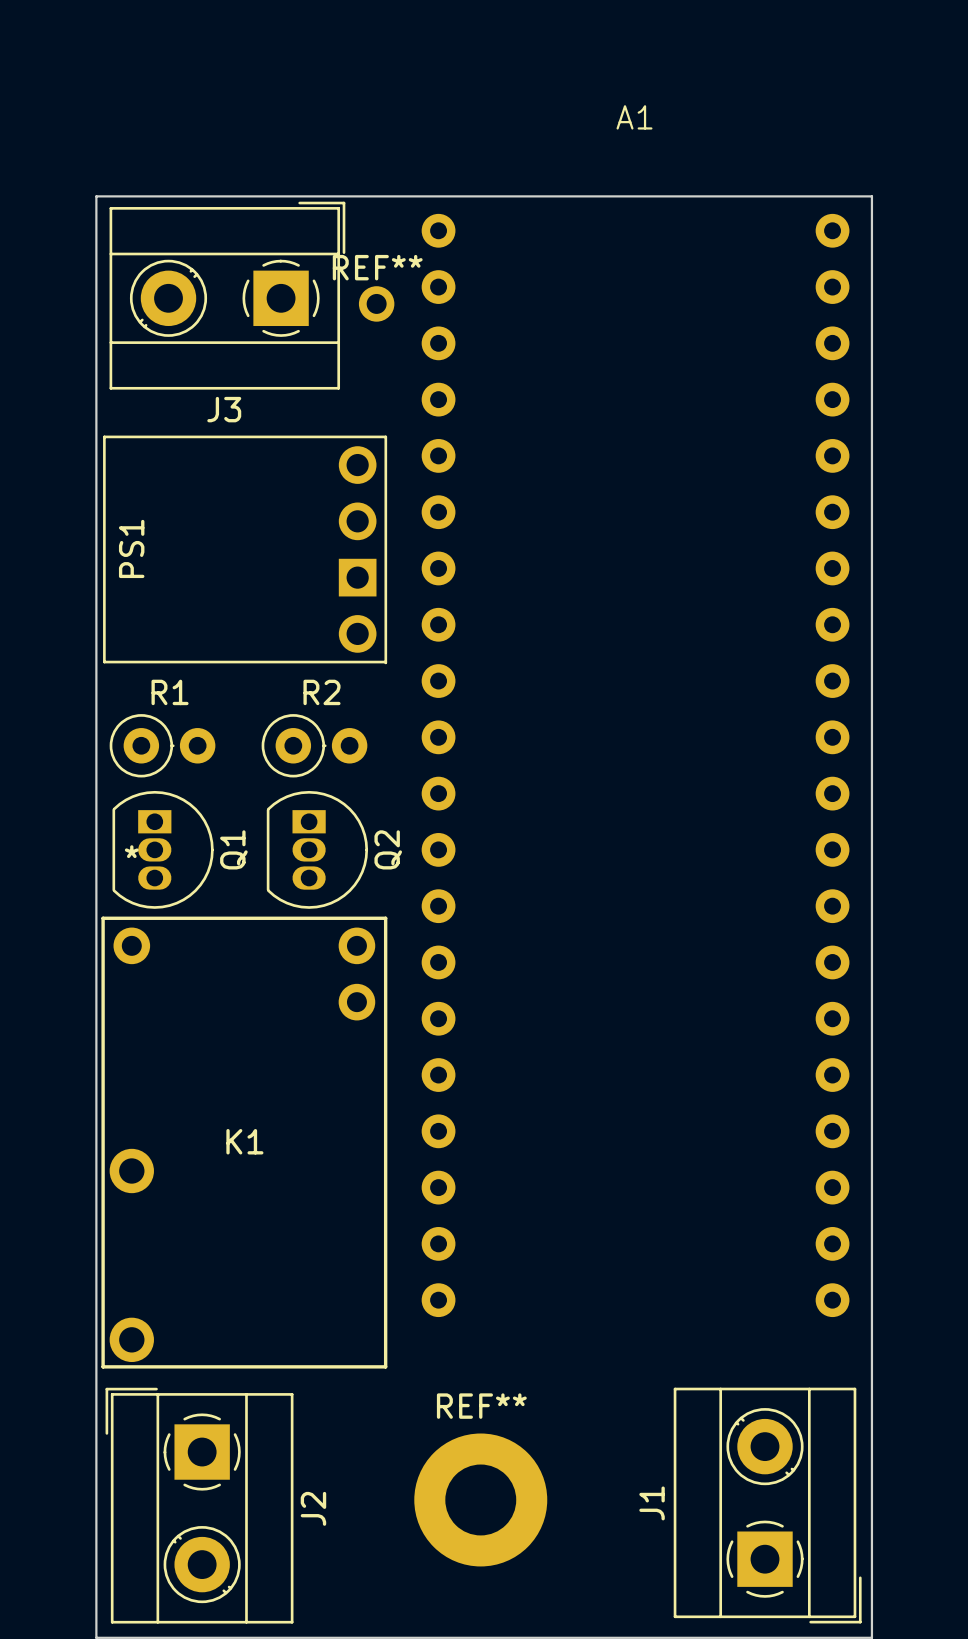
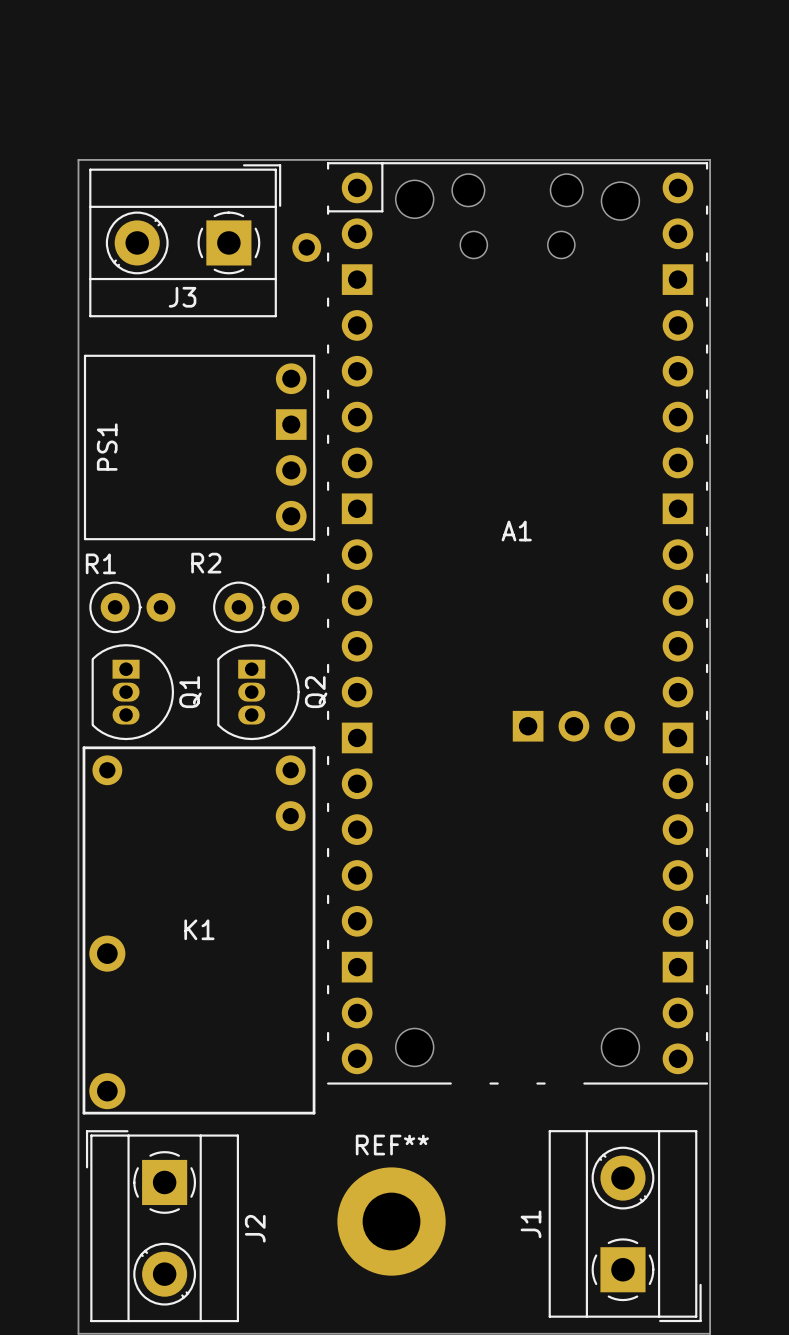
A1 name position: A1 (634, 117) -> A1 (516, 531)
A1 footprint: [421, 213, 850, 1318] -> [327, 162, 709, 1085]
REF** name: REF** (377, 267) -> none
J3 name position: J3 (224, 409) -> J3 (182, 297)
PS1 footprint: [103, 435, 388, 665] -> [83, 354, 316, 541]
R1 name position: R1 (170, 692) -> R1 (100, 563)
R2 name position: R2 (321, 692) -> R2 (206, 563)
K1 text: * (131, 851) -> none

